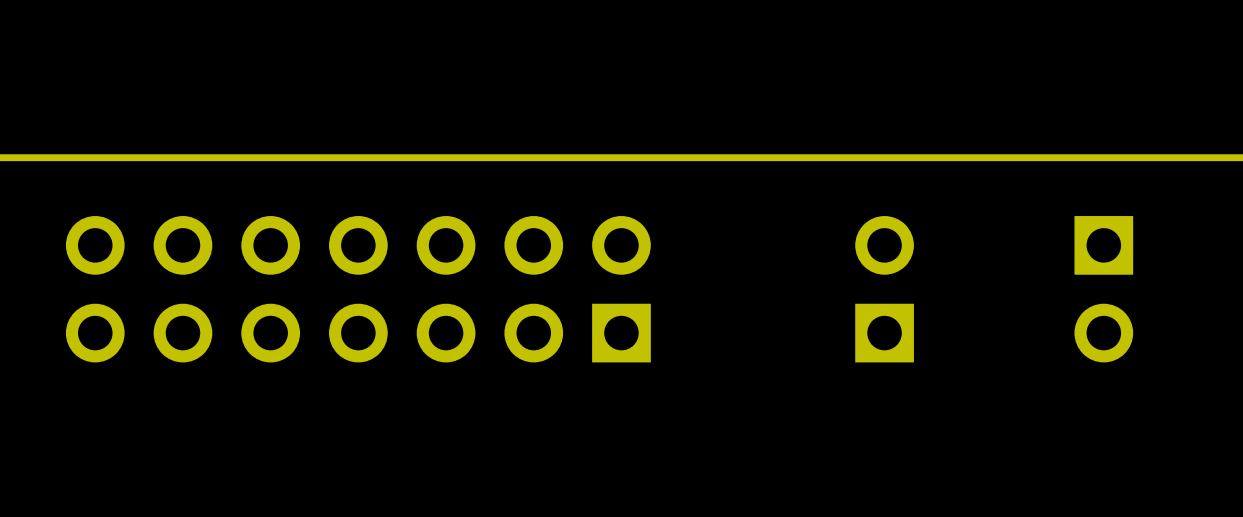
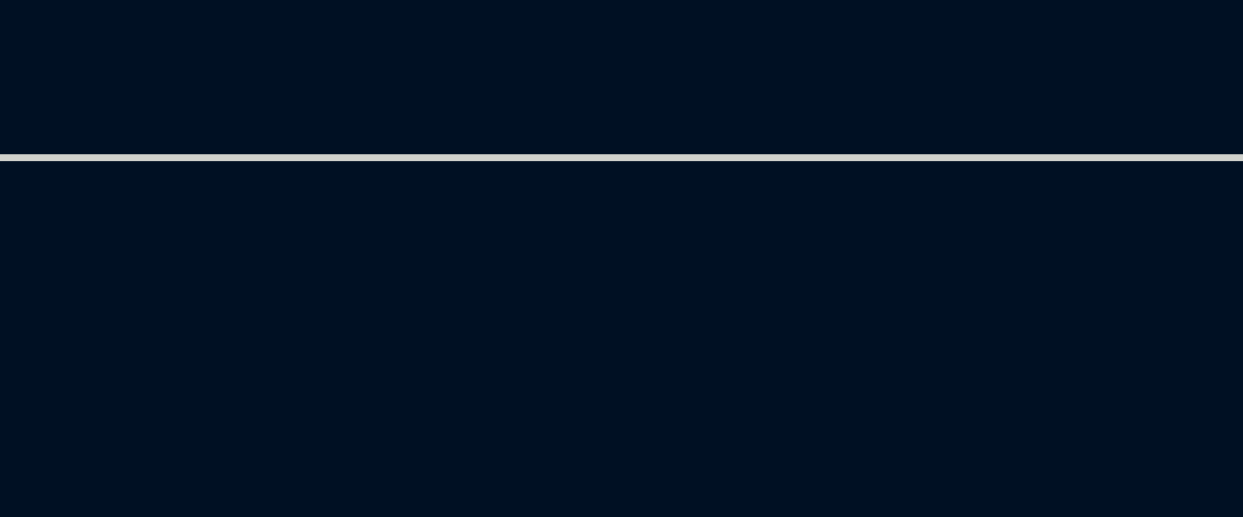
part: (358, 289) -> none
part: (884, 289) -> none
part: (1103, 289) -> none

